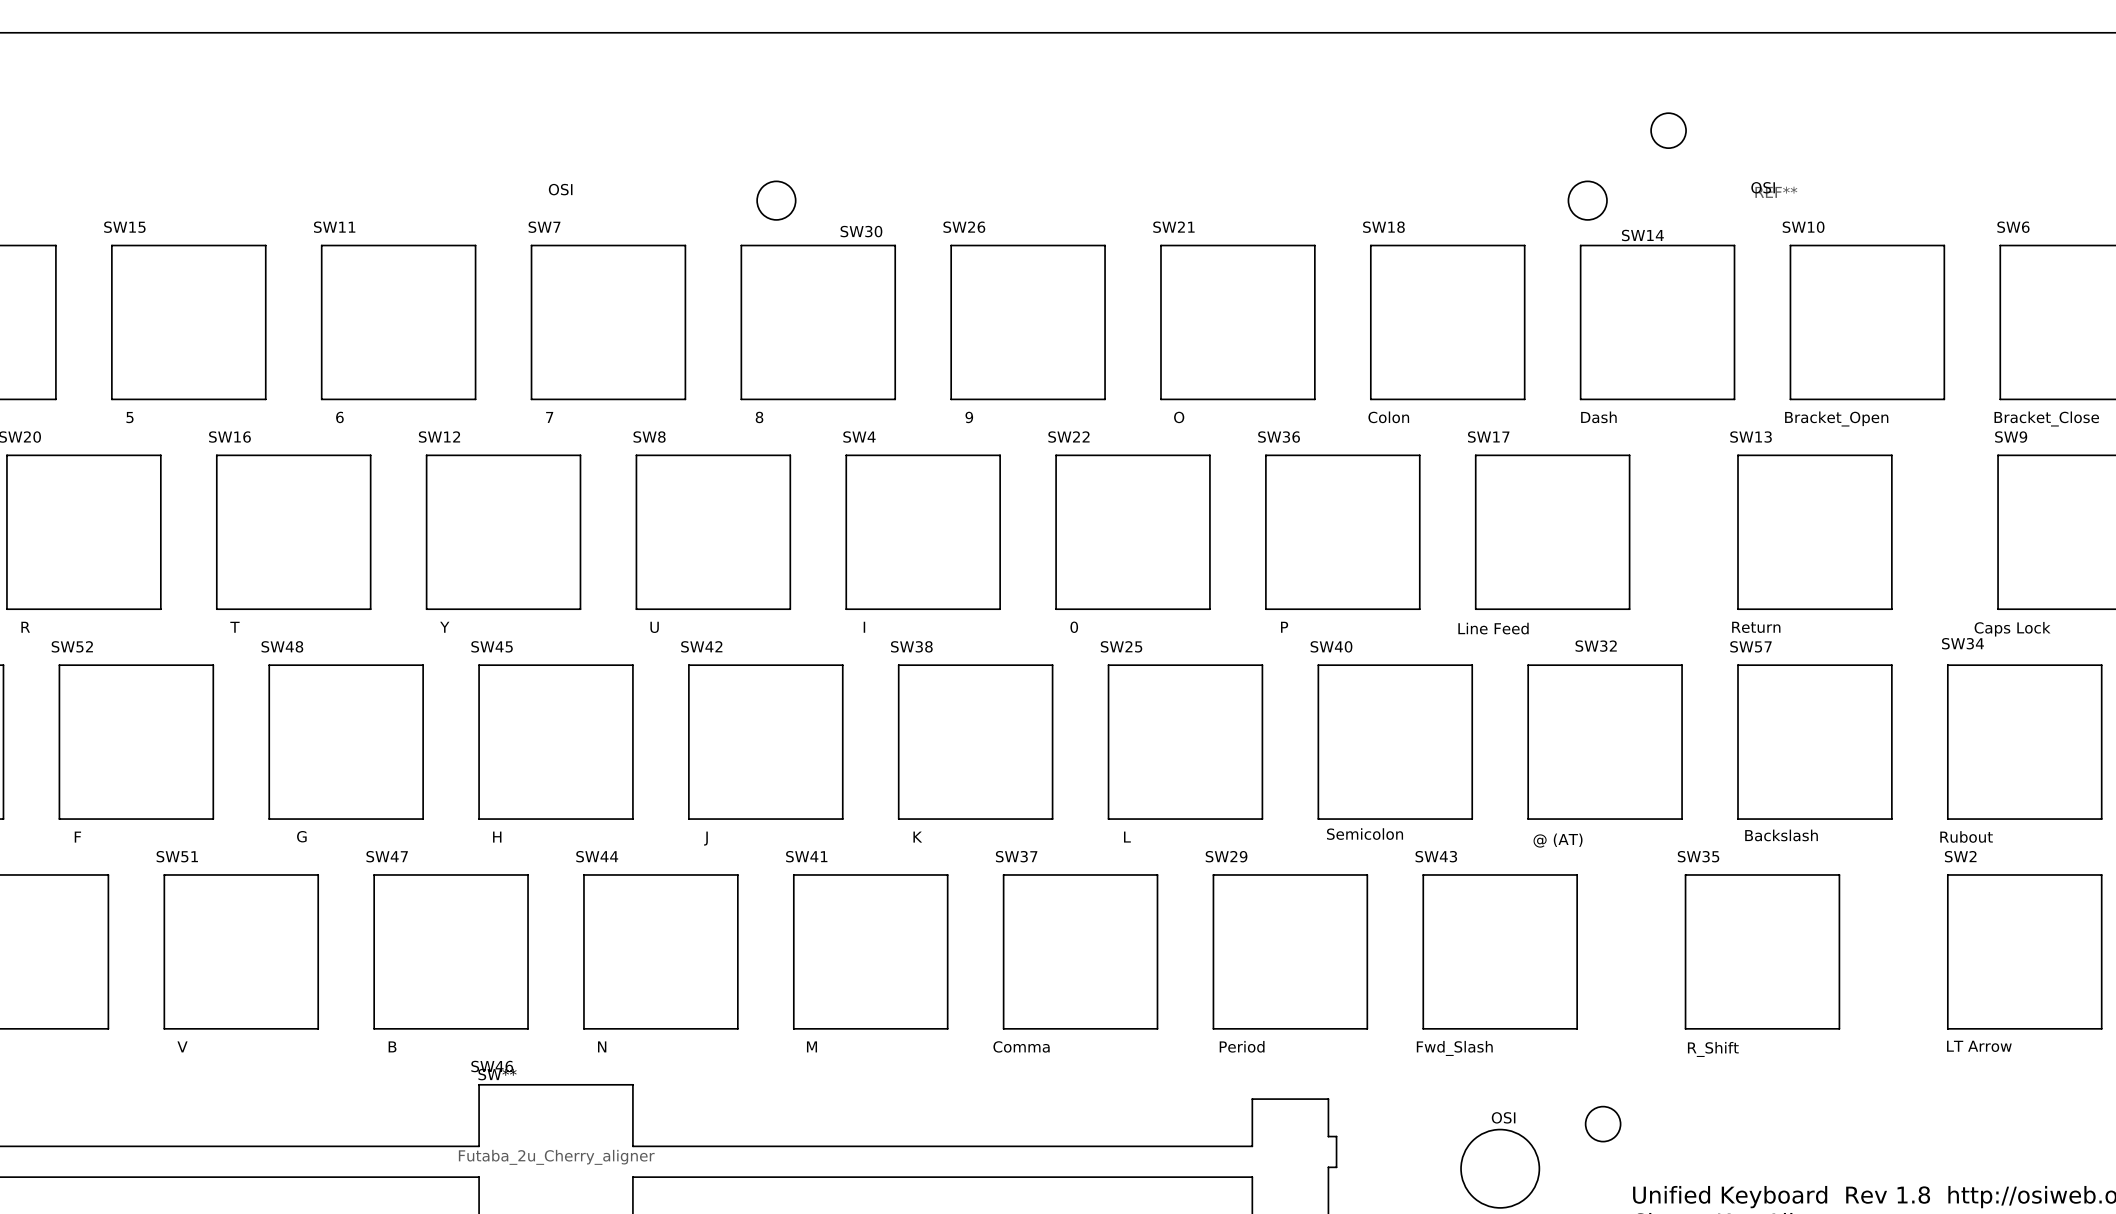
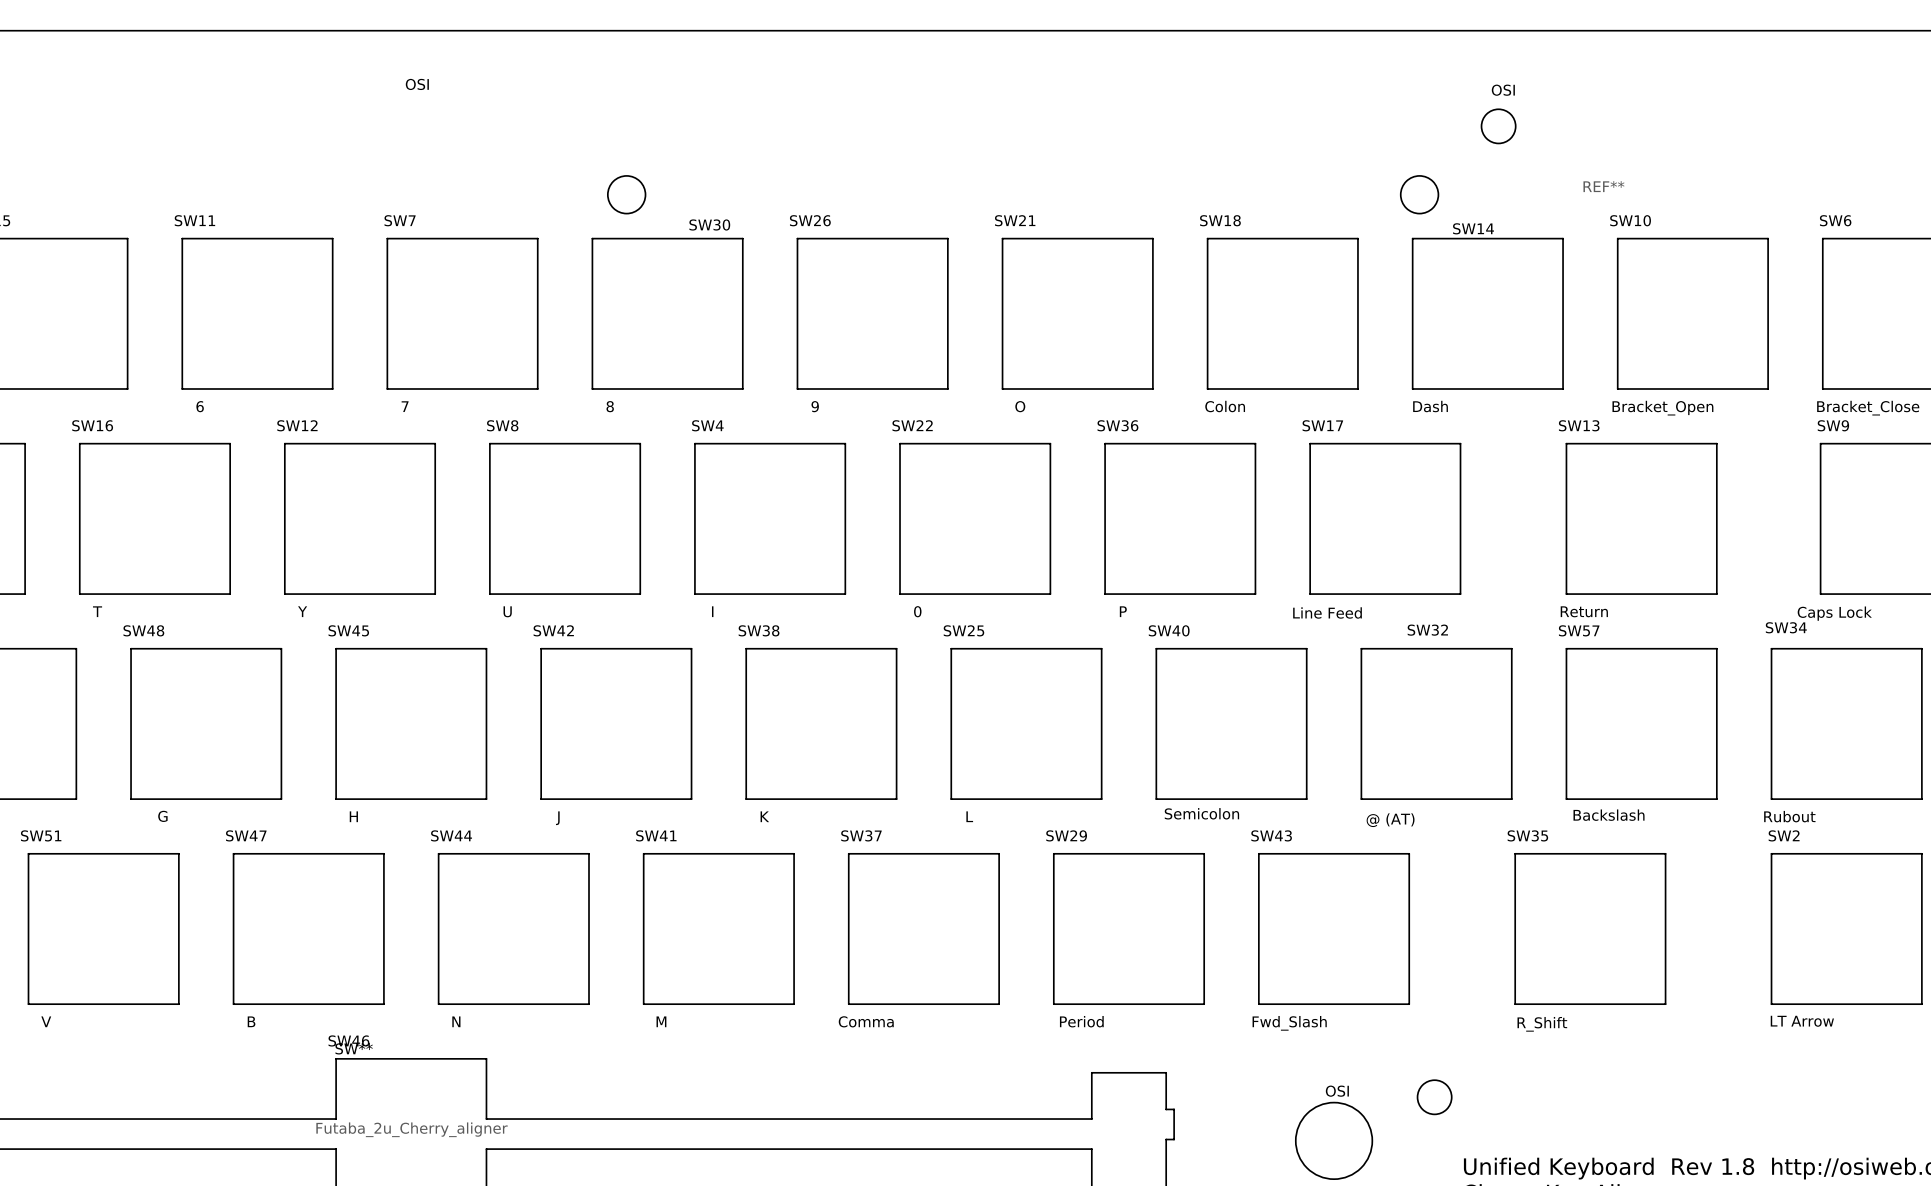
REF** text position: OSI (1763, 187) -> OSI (1503, 90)
REF** text position: OSI (560, 189) -> OSI (417, 84)

